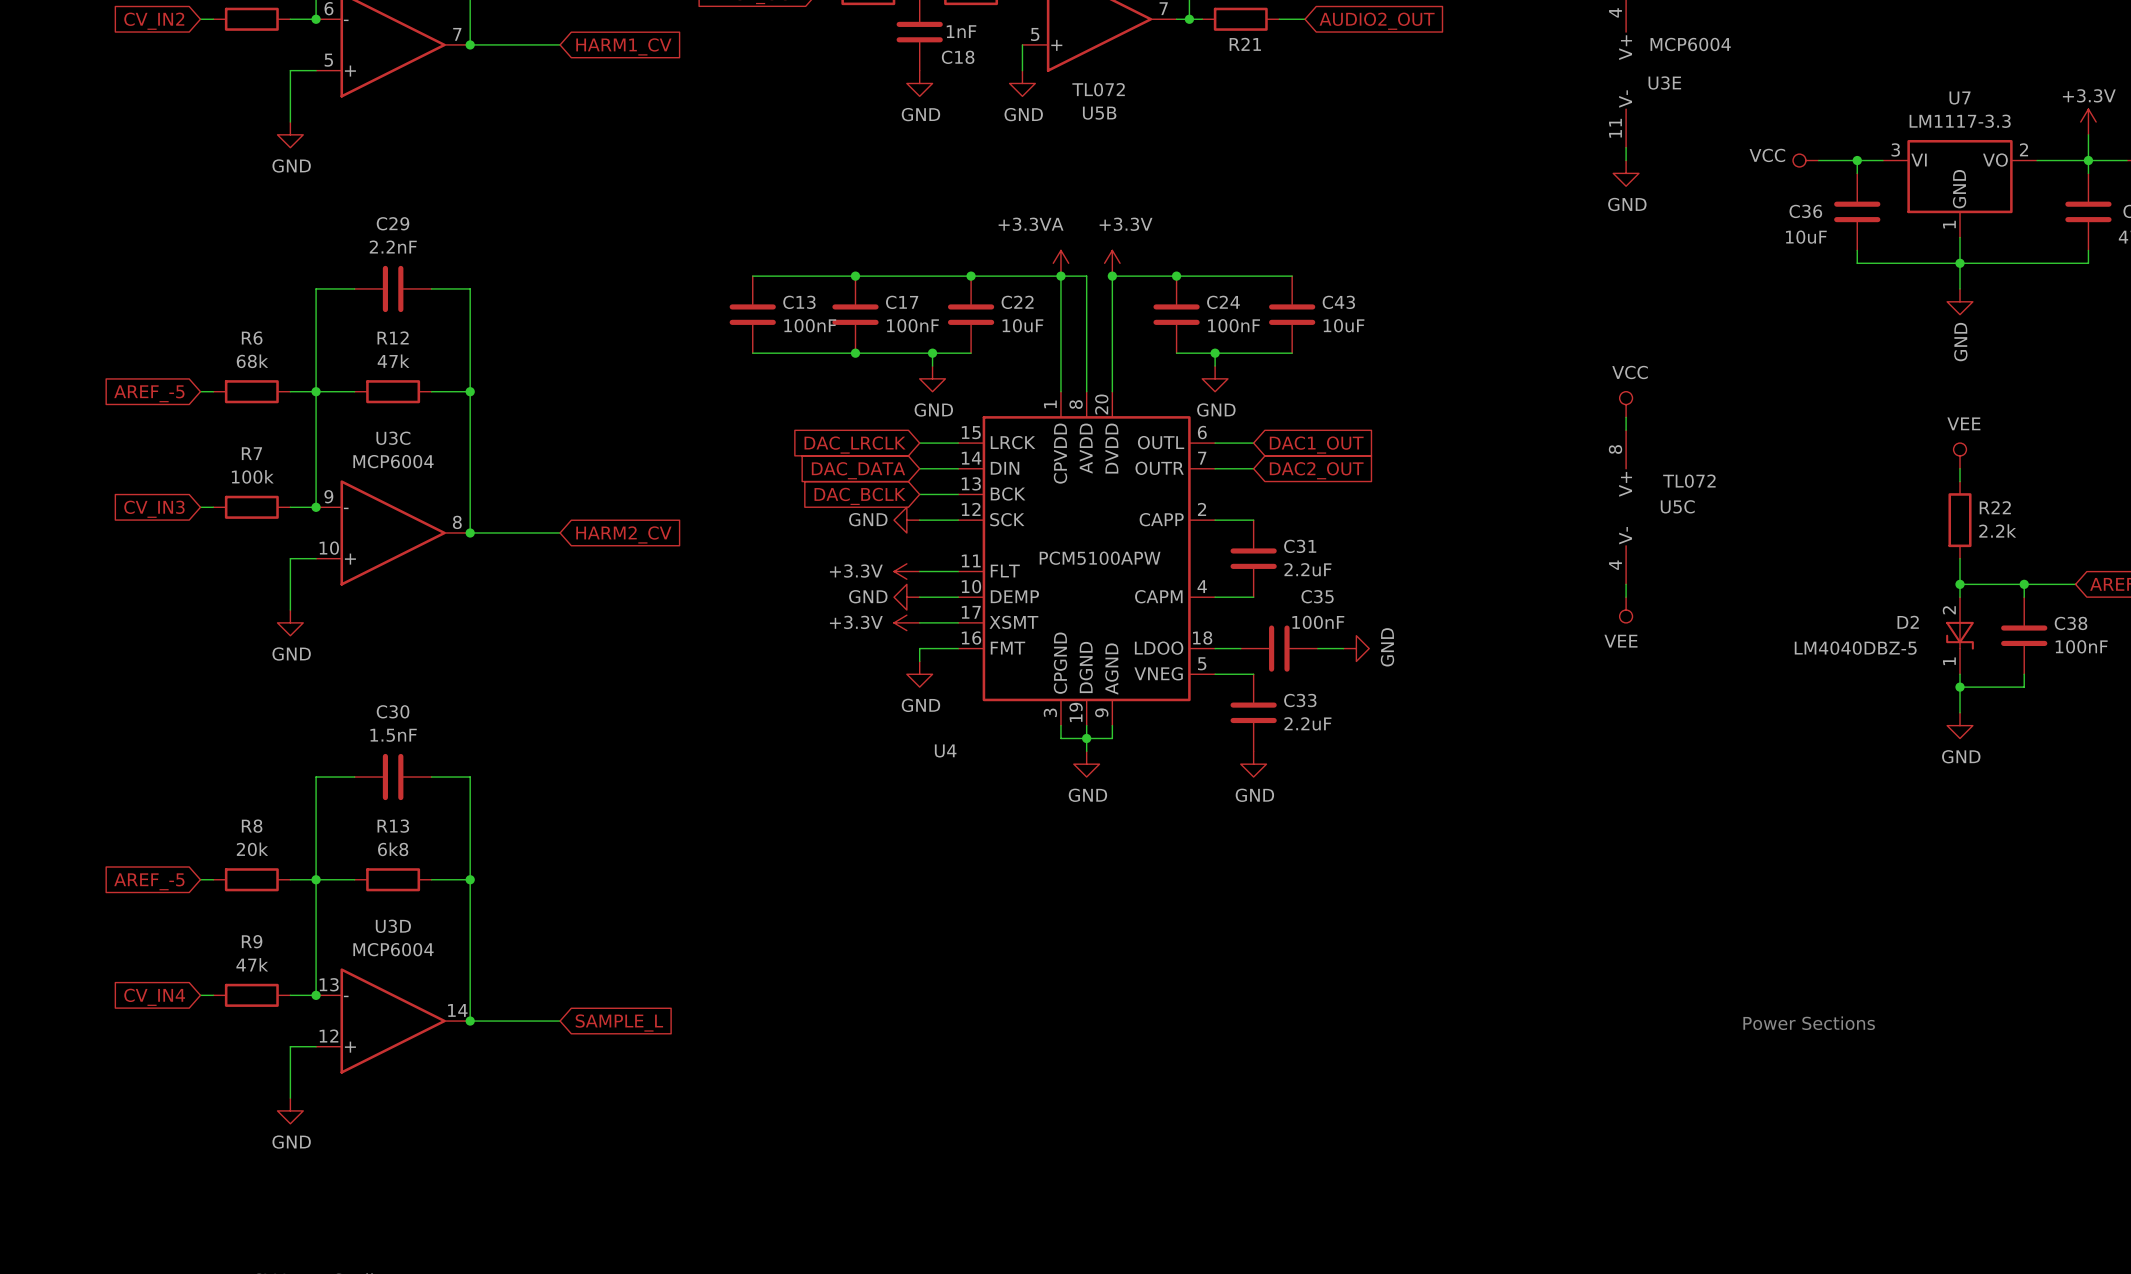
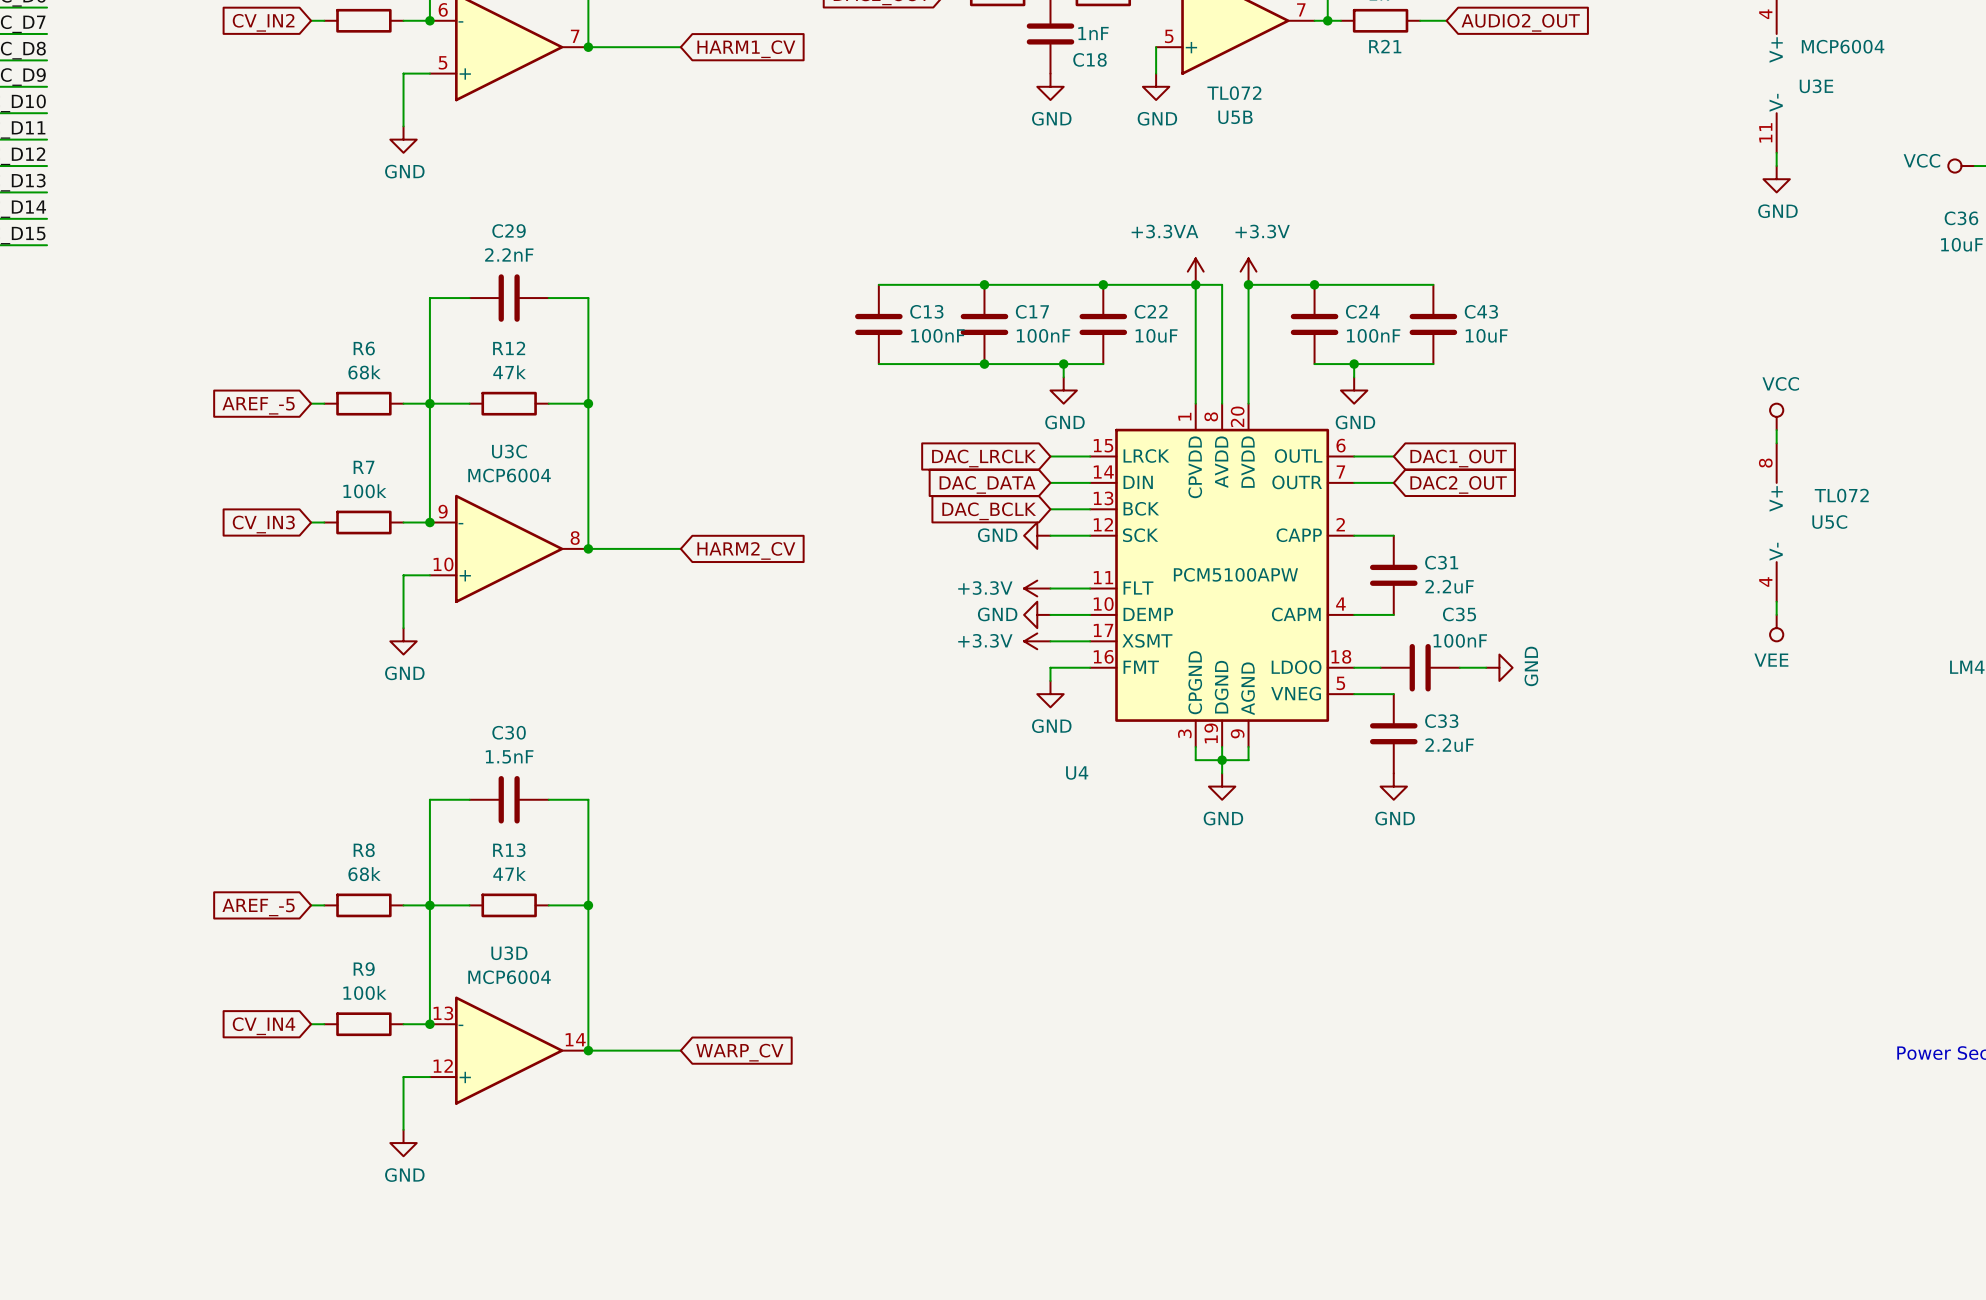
R8 value: 20k (252, 849) -> 68k (364, 874)
R13 value: 6k8 (393, 849) -> 47k (509, 873)
R9 value: 47k (252, 964) -> 100k (364, 992)
global label: SAMPLE_L (619, 1022) -> WARP_CV (739, 1052)

